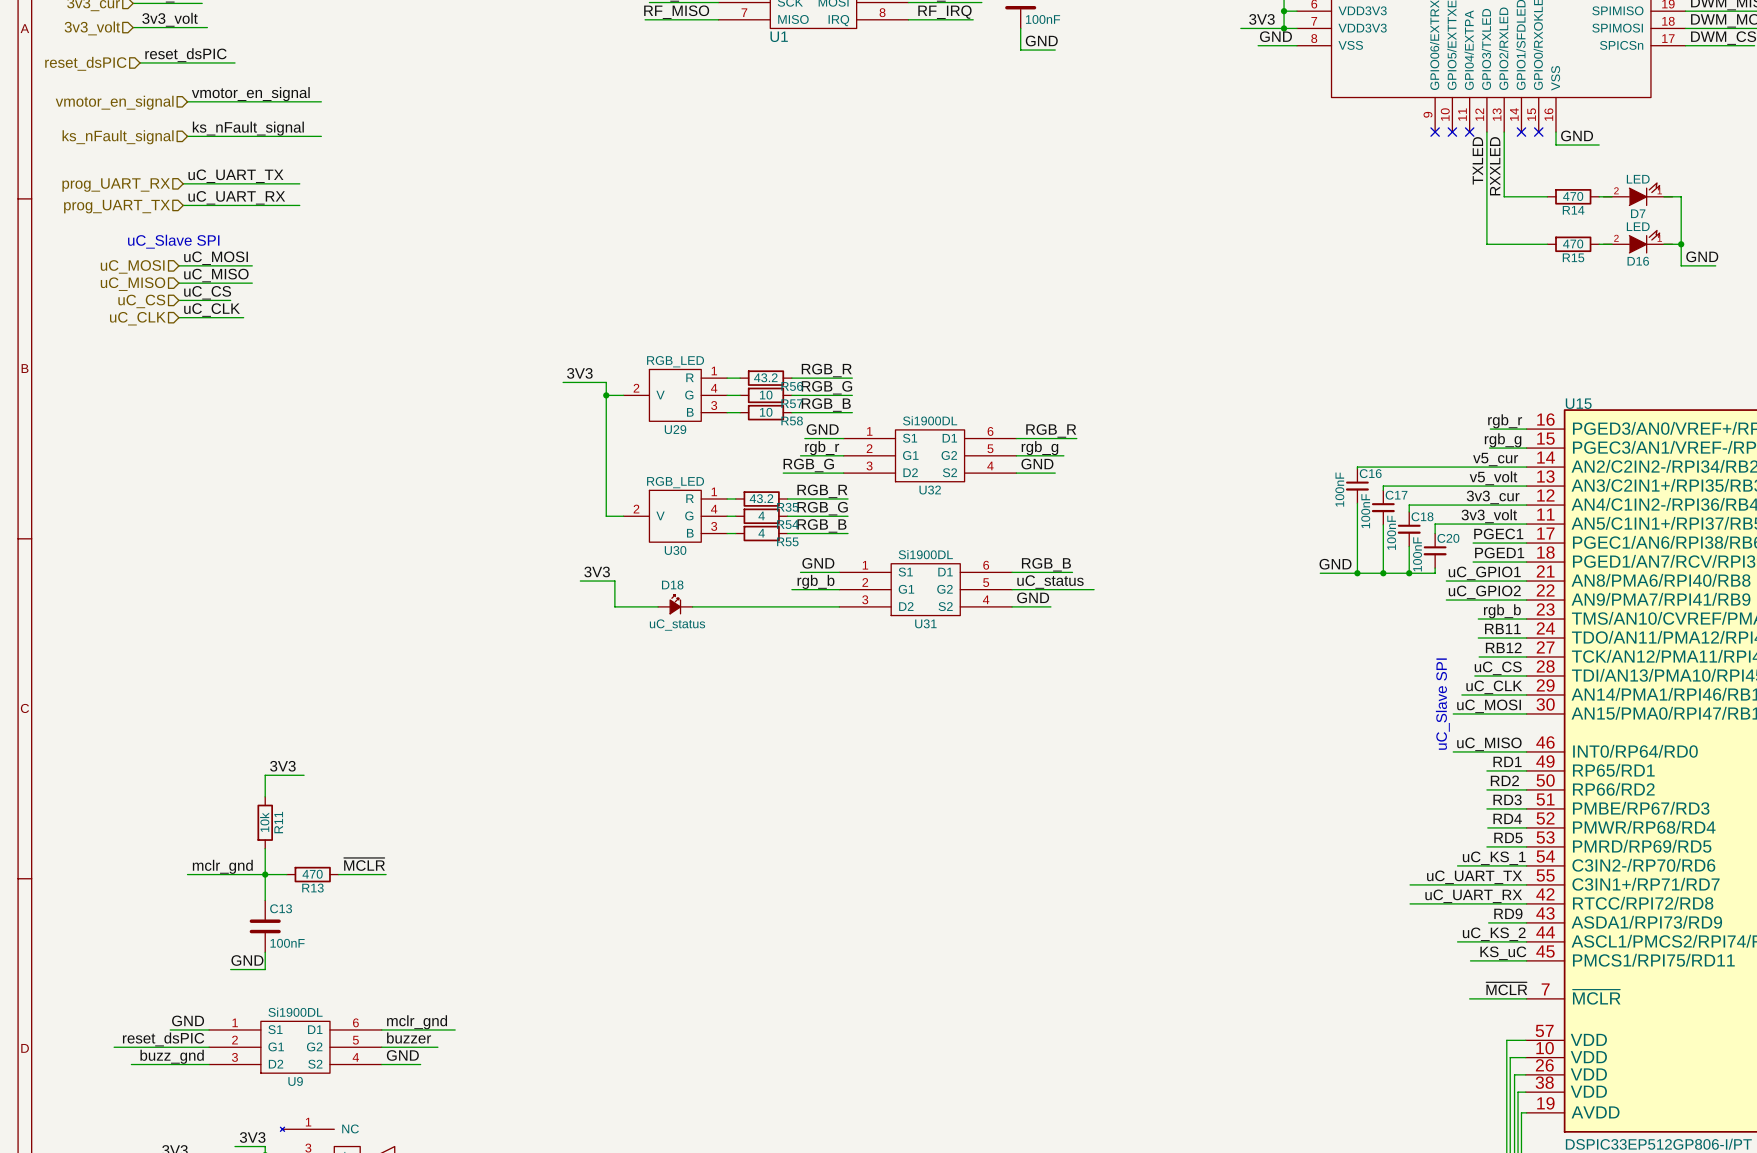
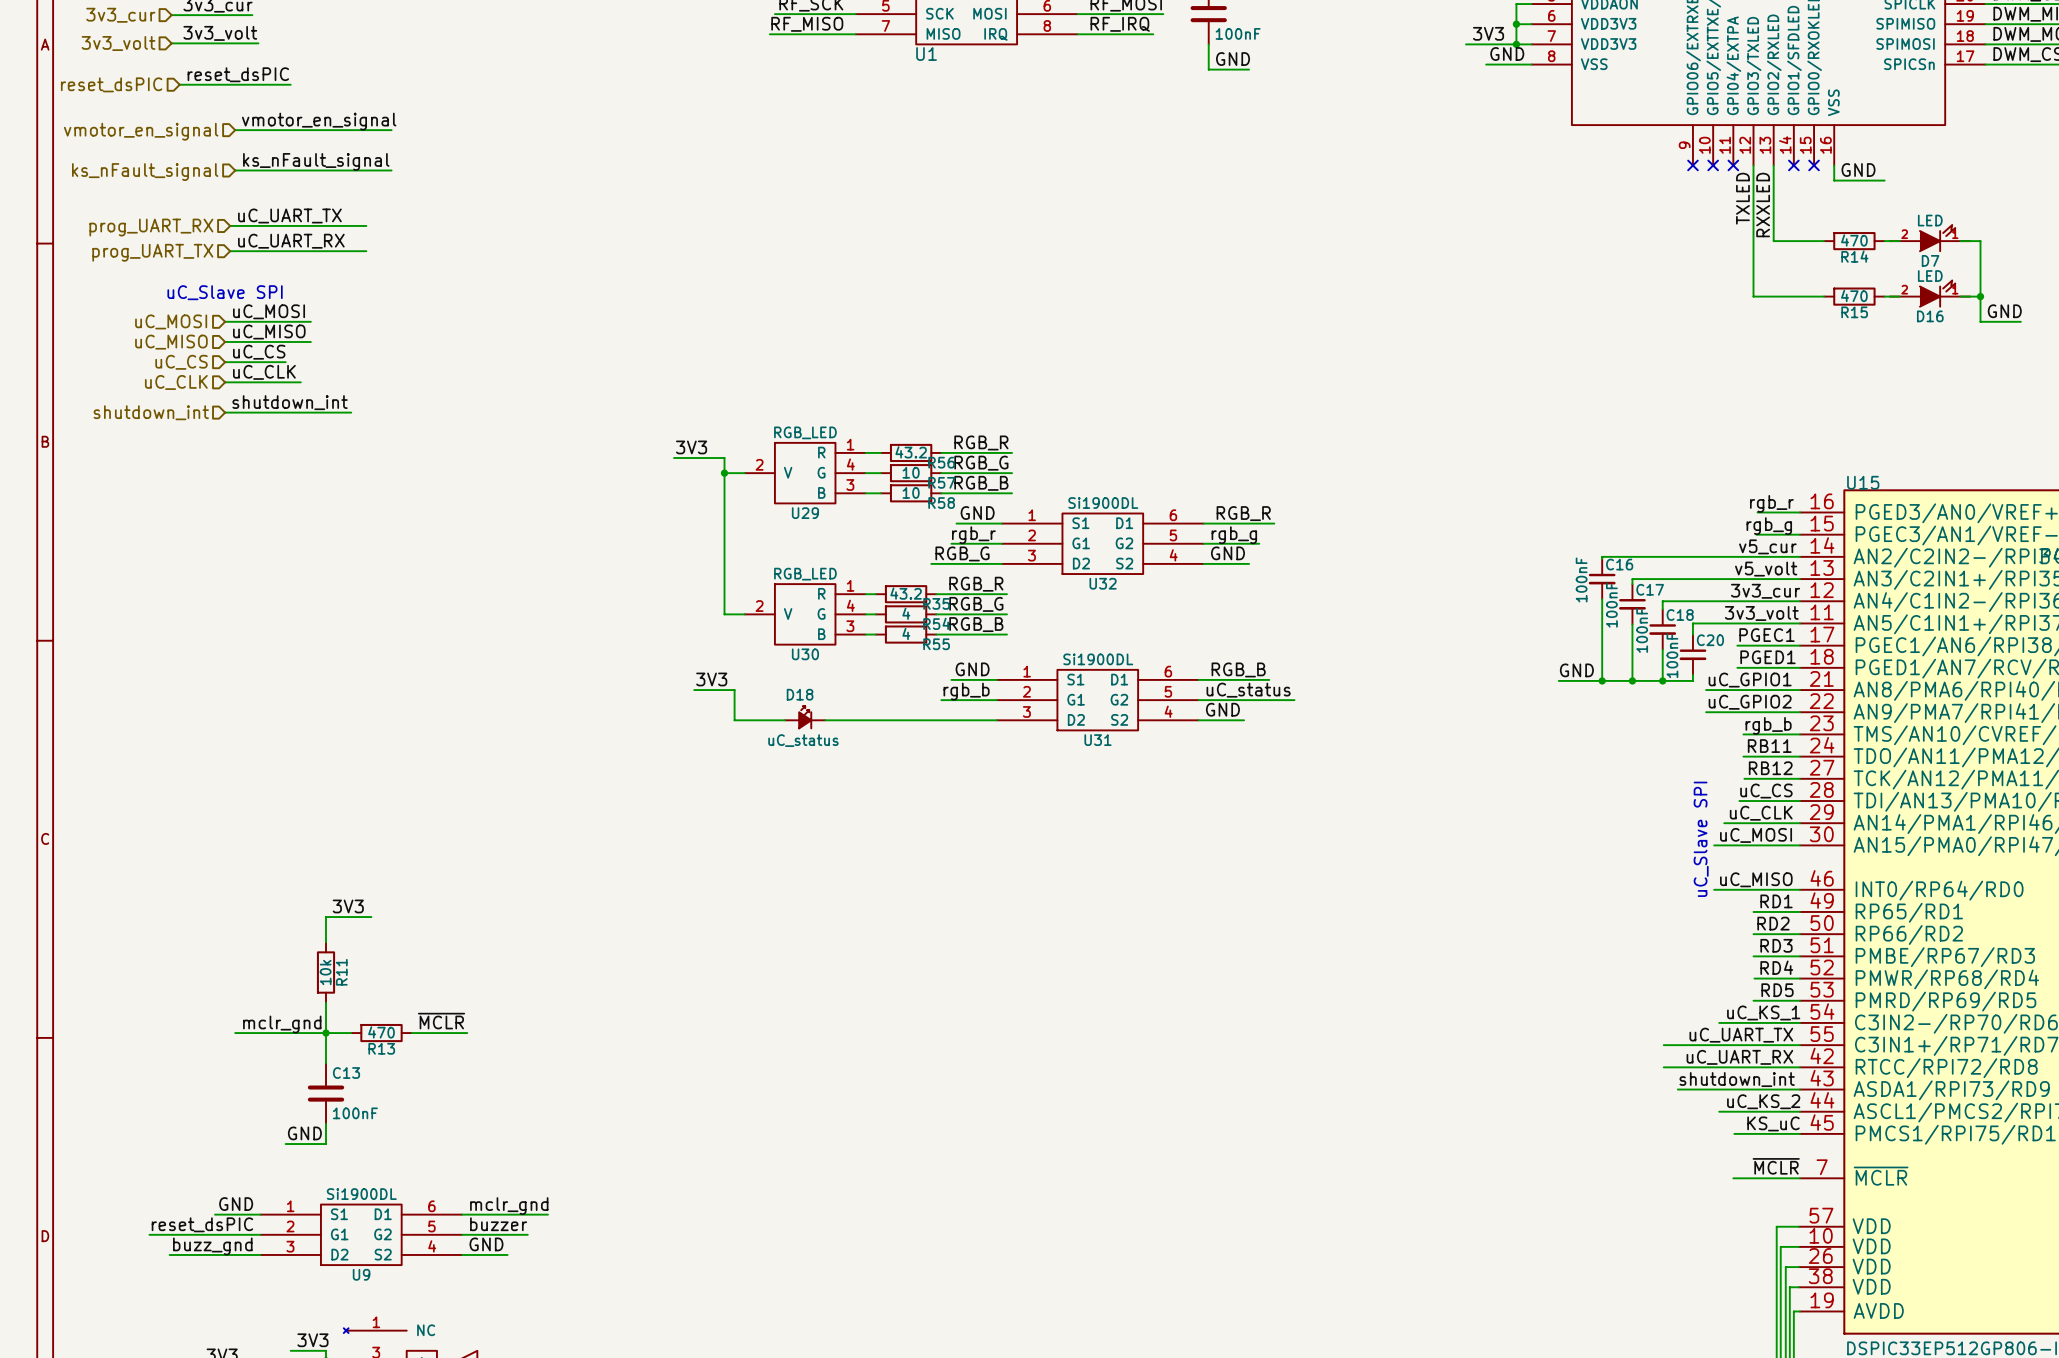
label: none -> shutdown_int (290, 402)
wire: none -> (225, 412) (351, 412)
hierarchical label: none -> shutdown_int (151, 412)
label: RD9 (1508, 913) -> shutdown_int (1737, 1079)
wire: none -> (1677, 1089) (1755, 1089)

